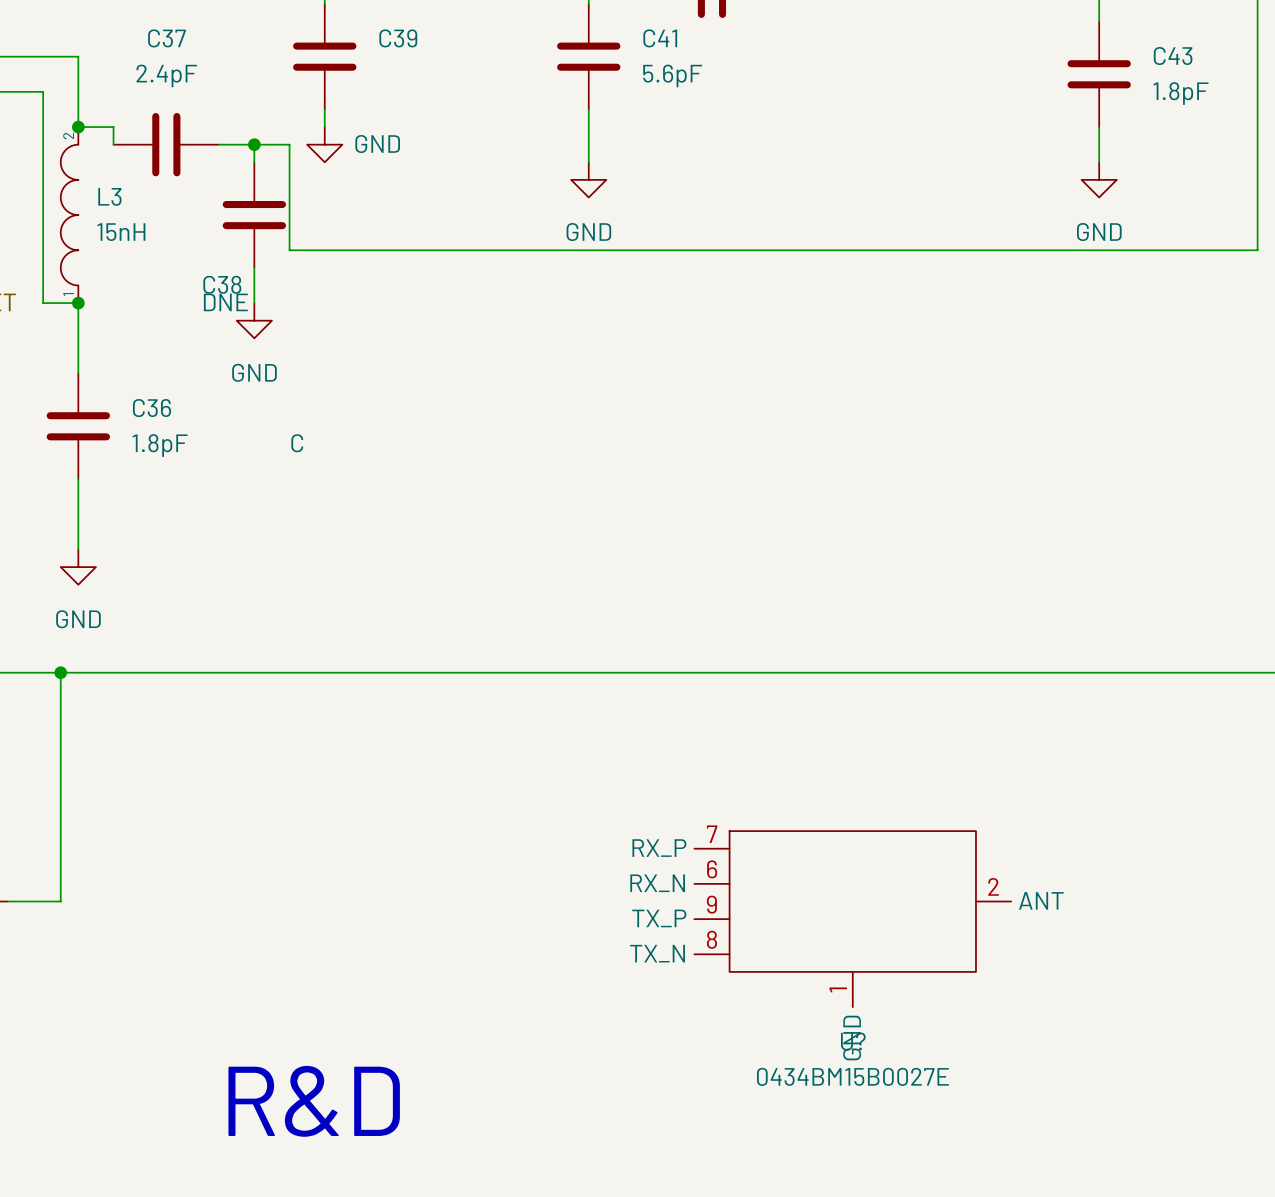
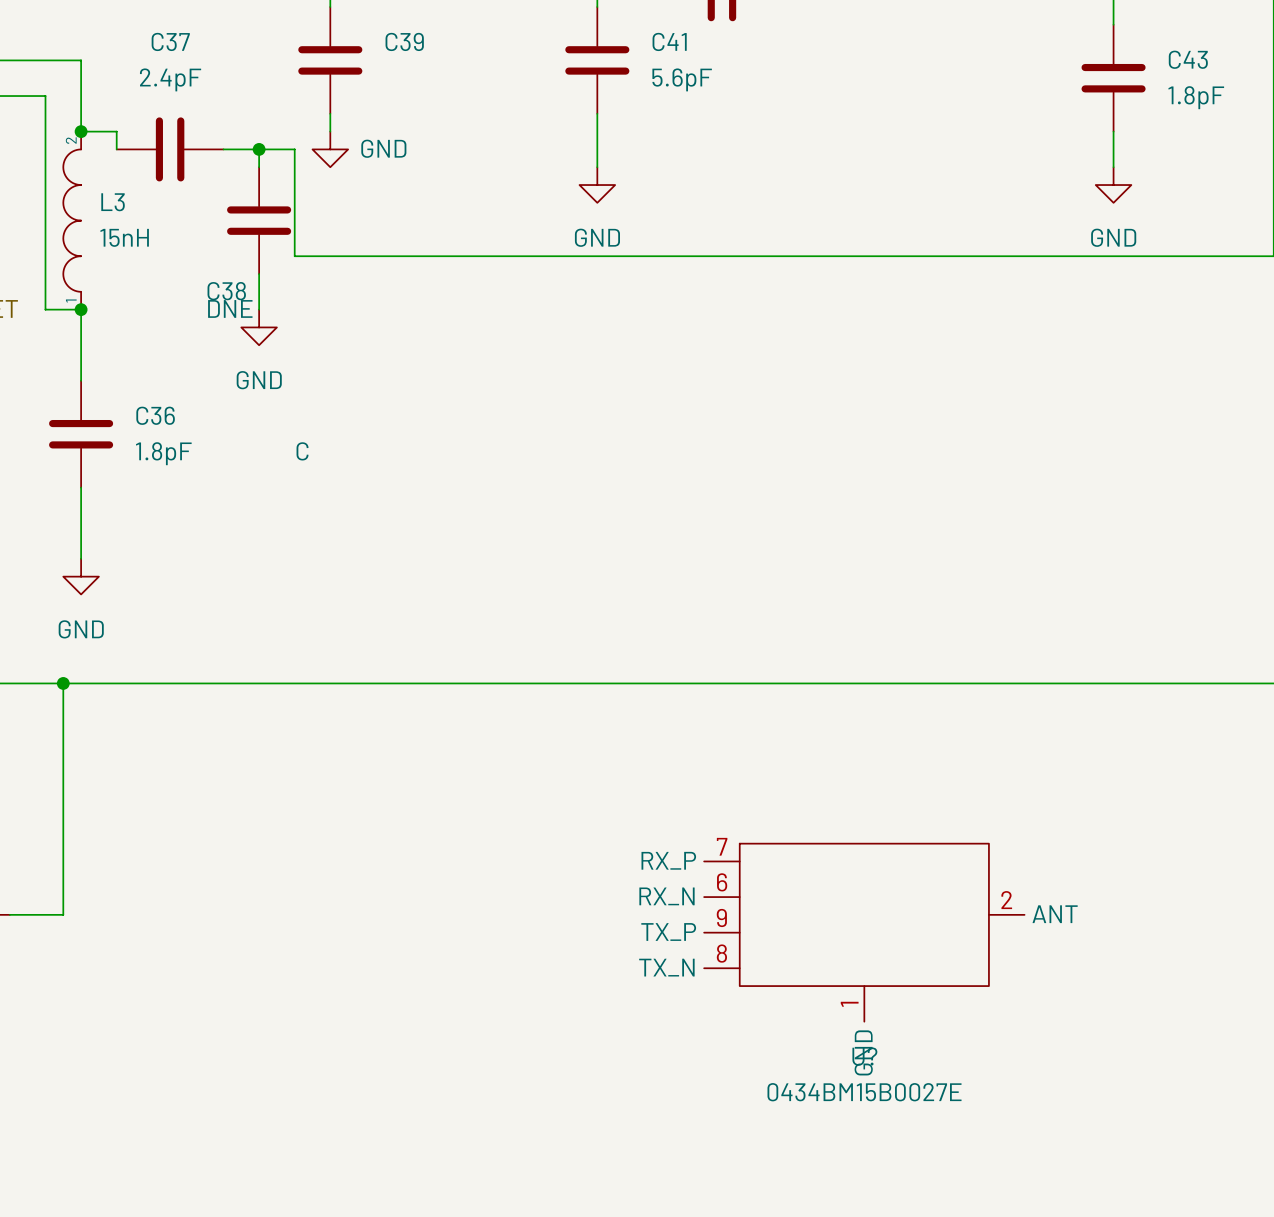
text: R&D (314, 1101) -> none

